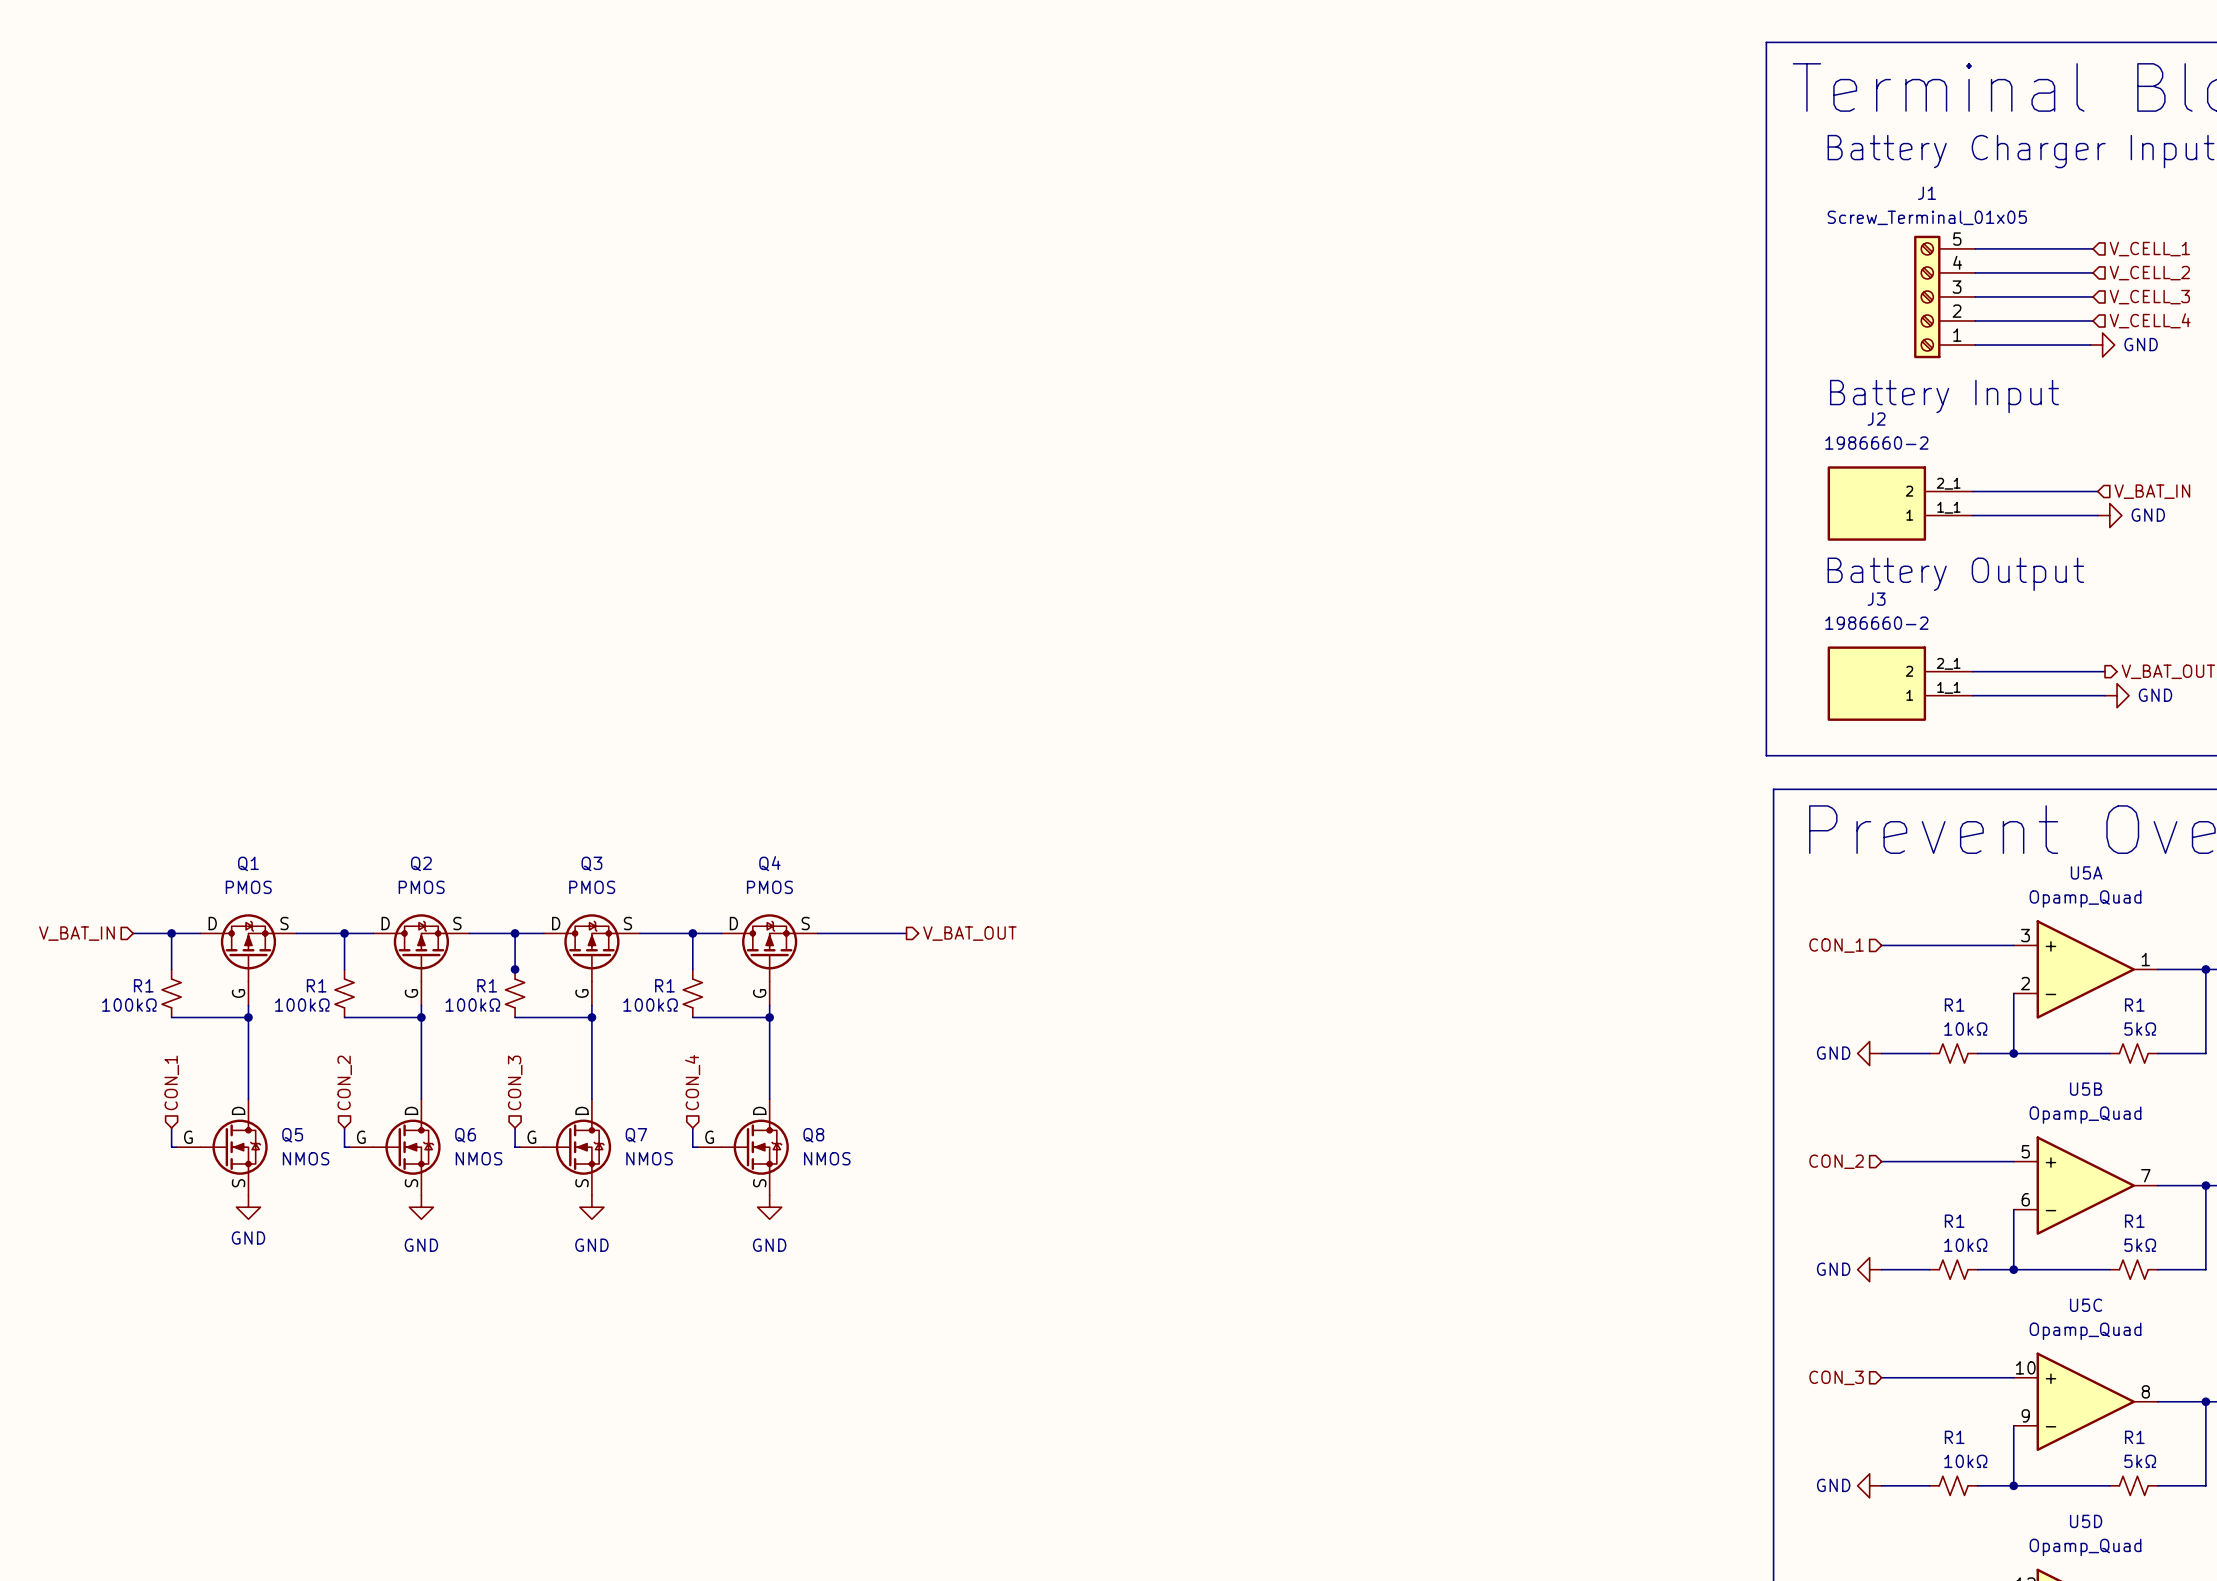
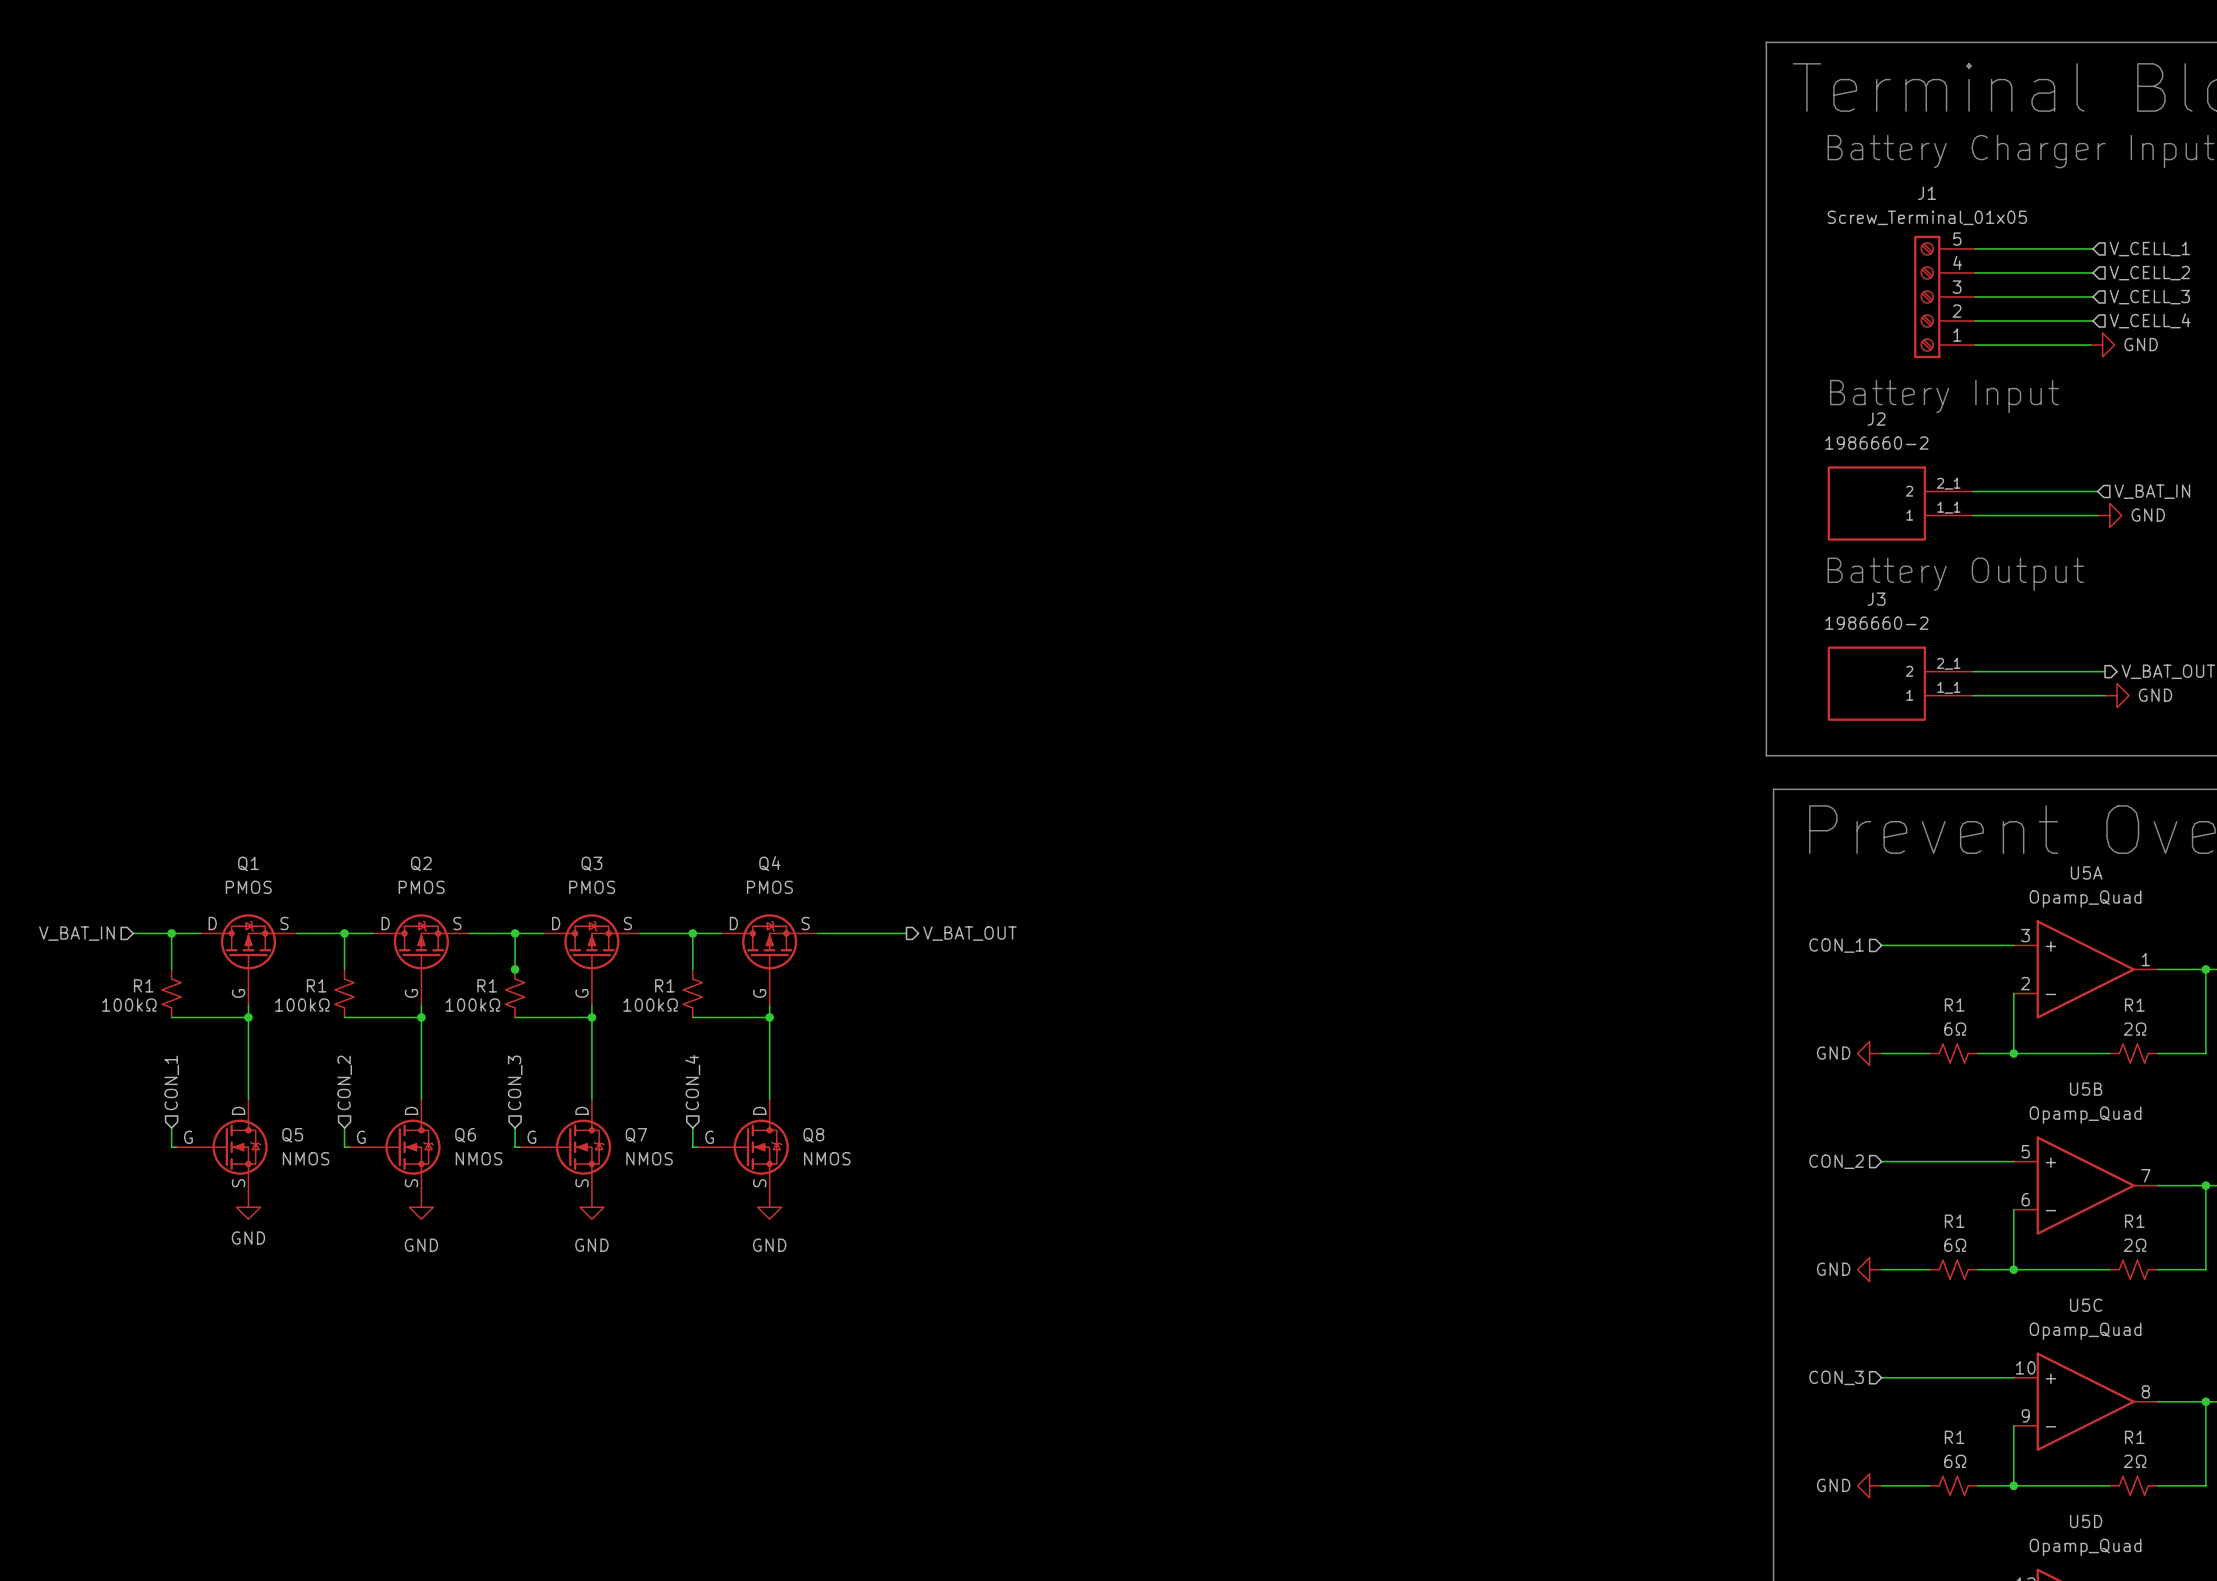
R1 value: 10kΩ (1965, 1029) -> 6Ω (1955, 1029)
R1 value: 5kΩ (2140, 1029) -> 2Ω (2135, 1029)
R1 value: 10kΩ (1965, 1245) -> 6Ω (1955, 1245)
R1 value: 5kΩ (2140, 1245) -> 2Ω (2135, 1245)
R1 value: 10kΩ (1965, 1461) -> 6Ω (1955, 1461)
R1 value: 5kΩ (2140, 1461) -> 2Ω (2135, 1461)

